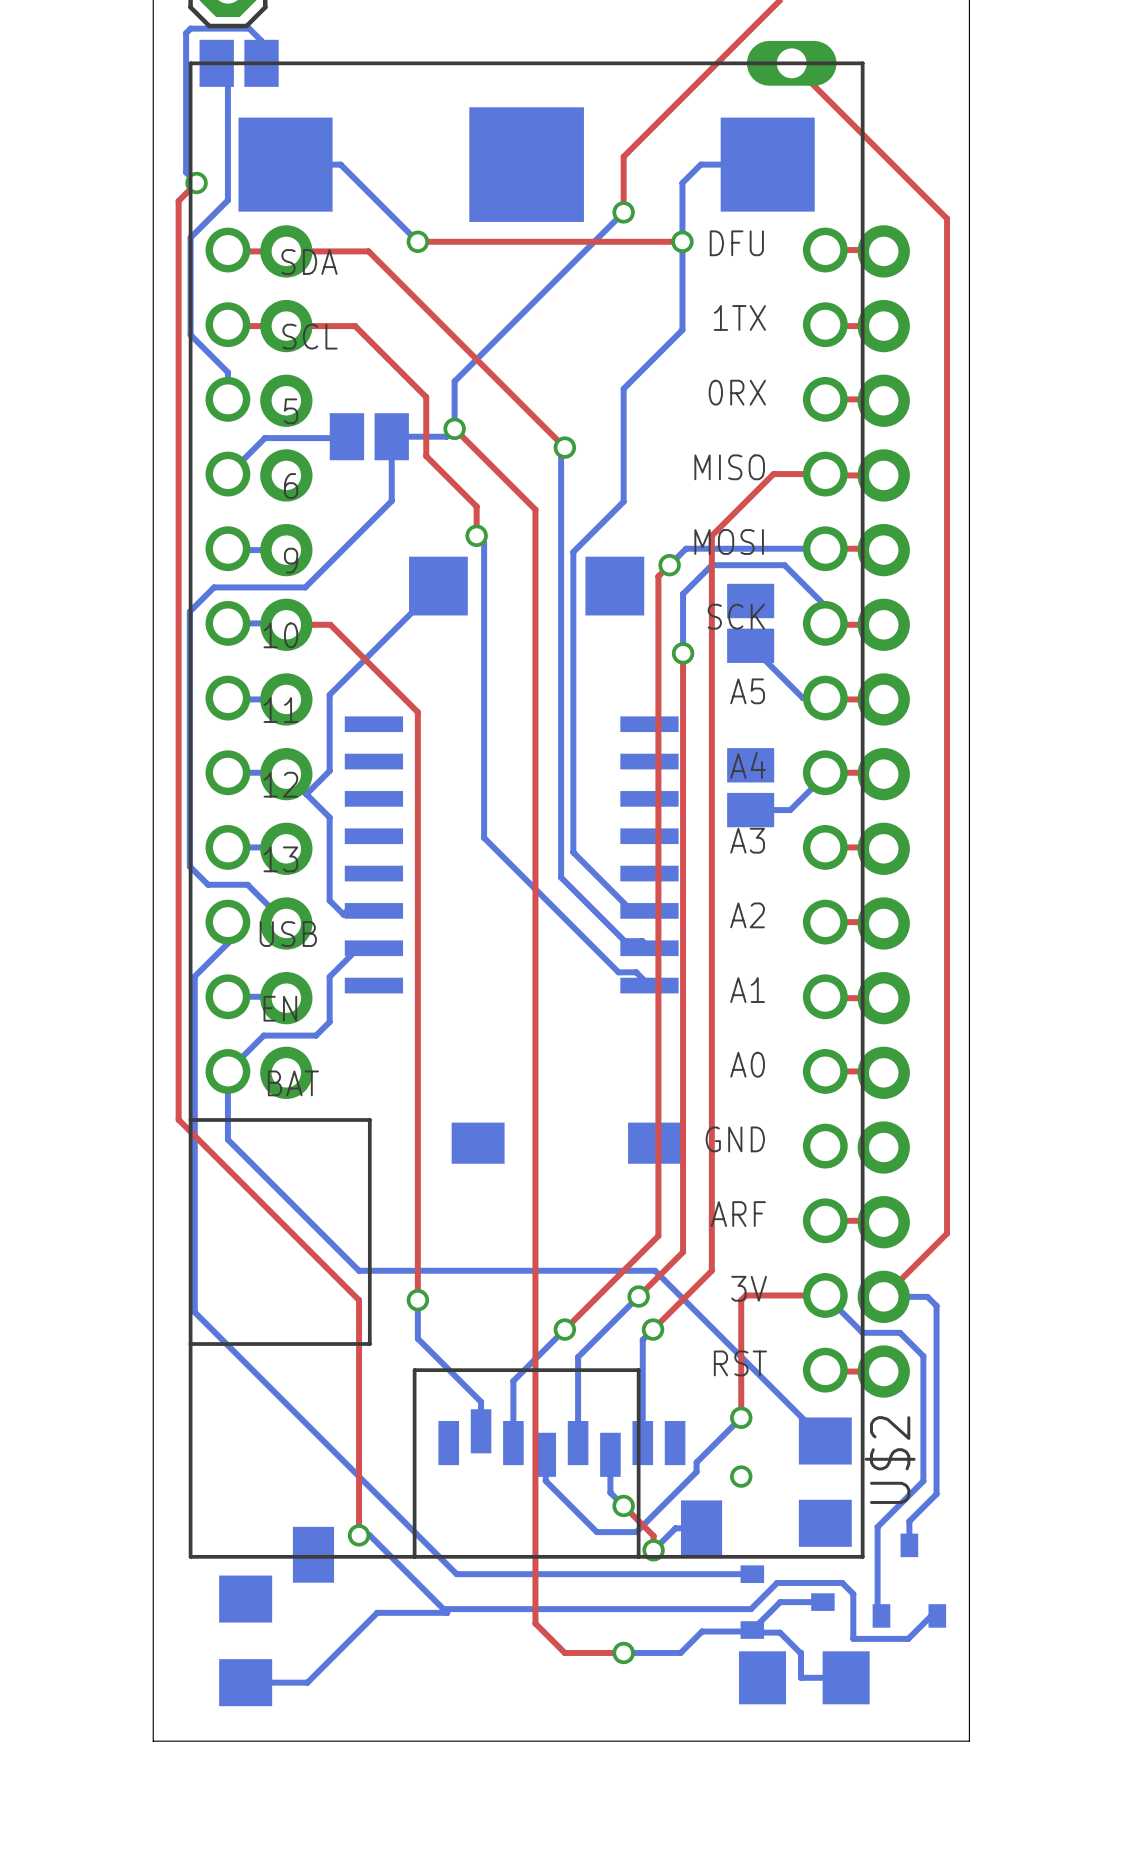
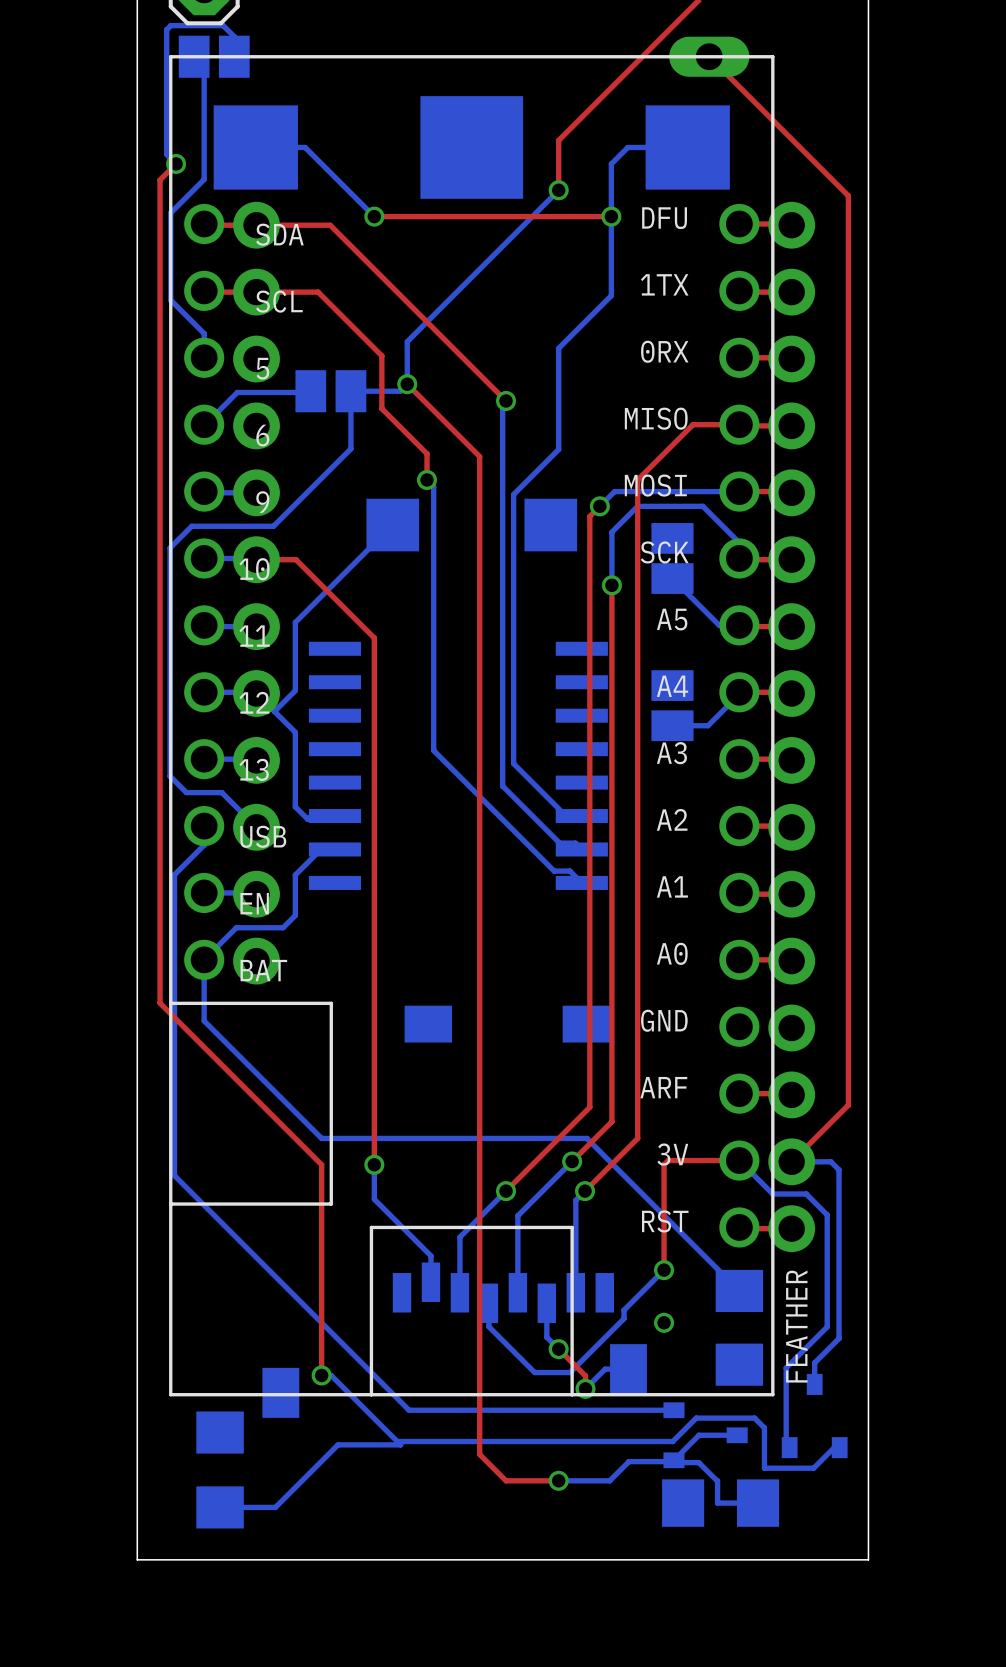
U$2 name: U$2 (890, 1460) -> FEATHER (796, 1326)

